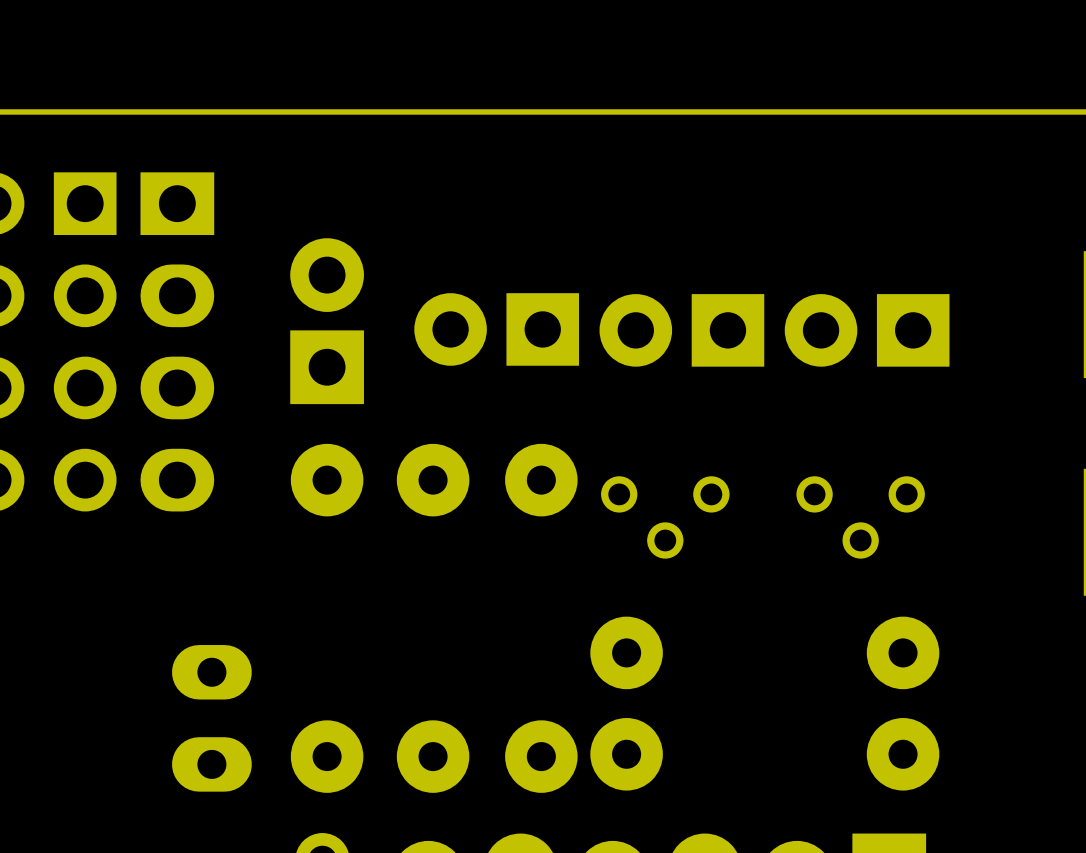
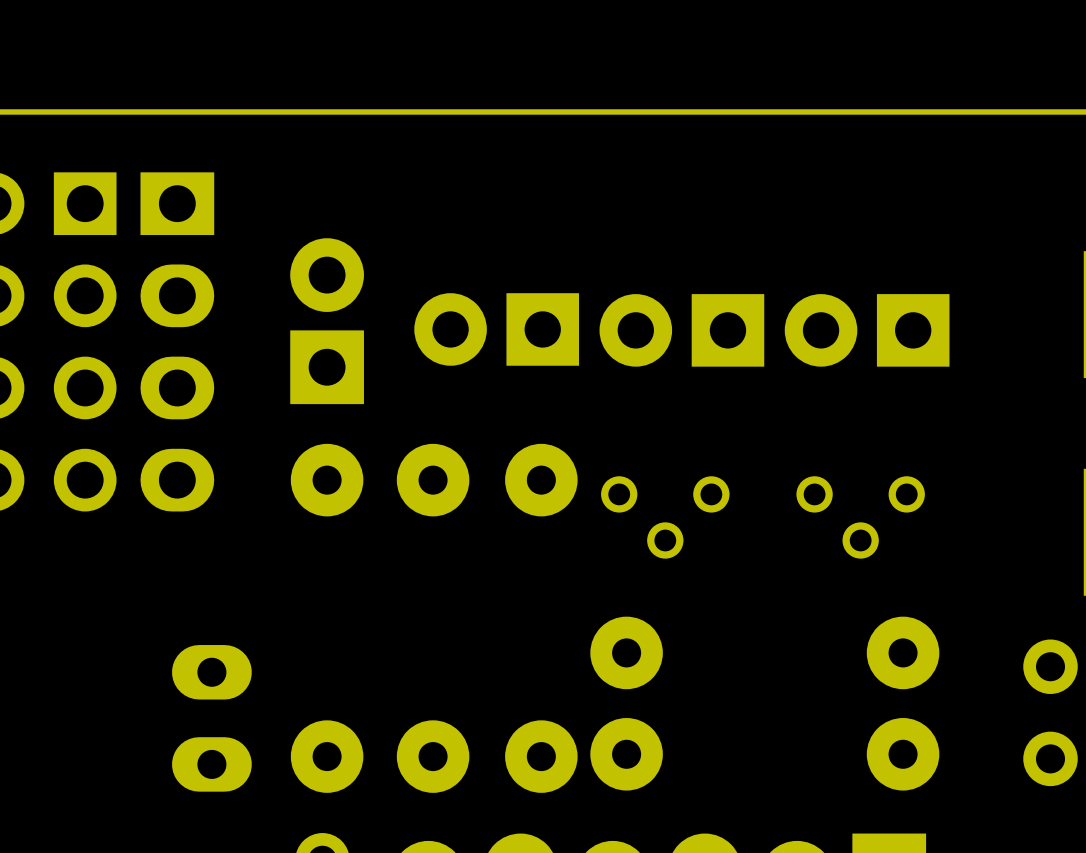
part: none -> (1050, 712)

